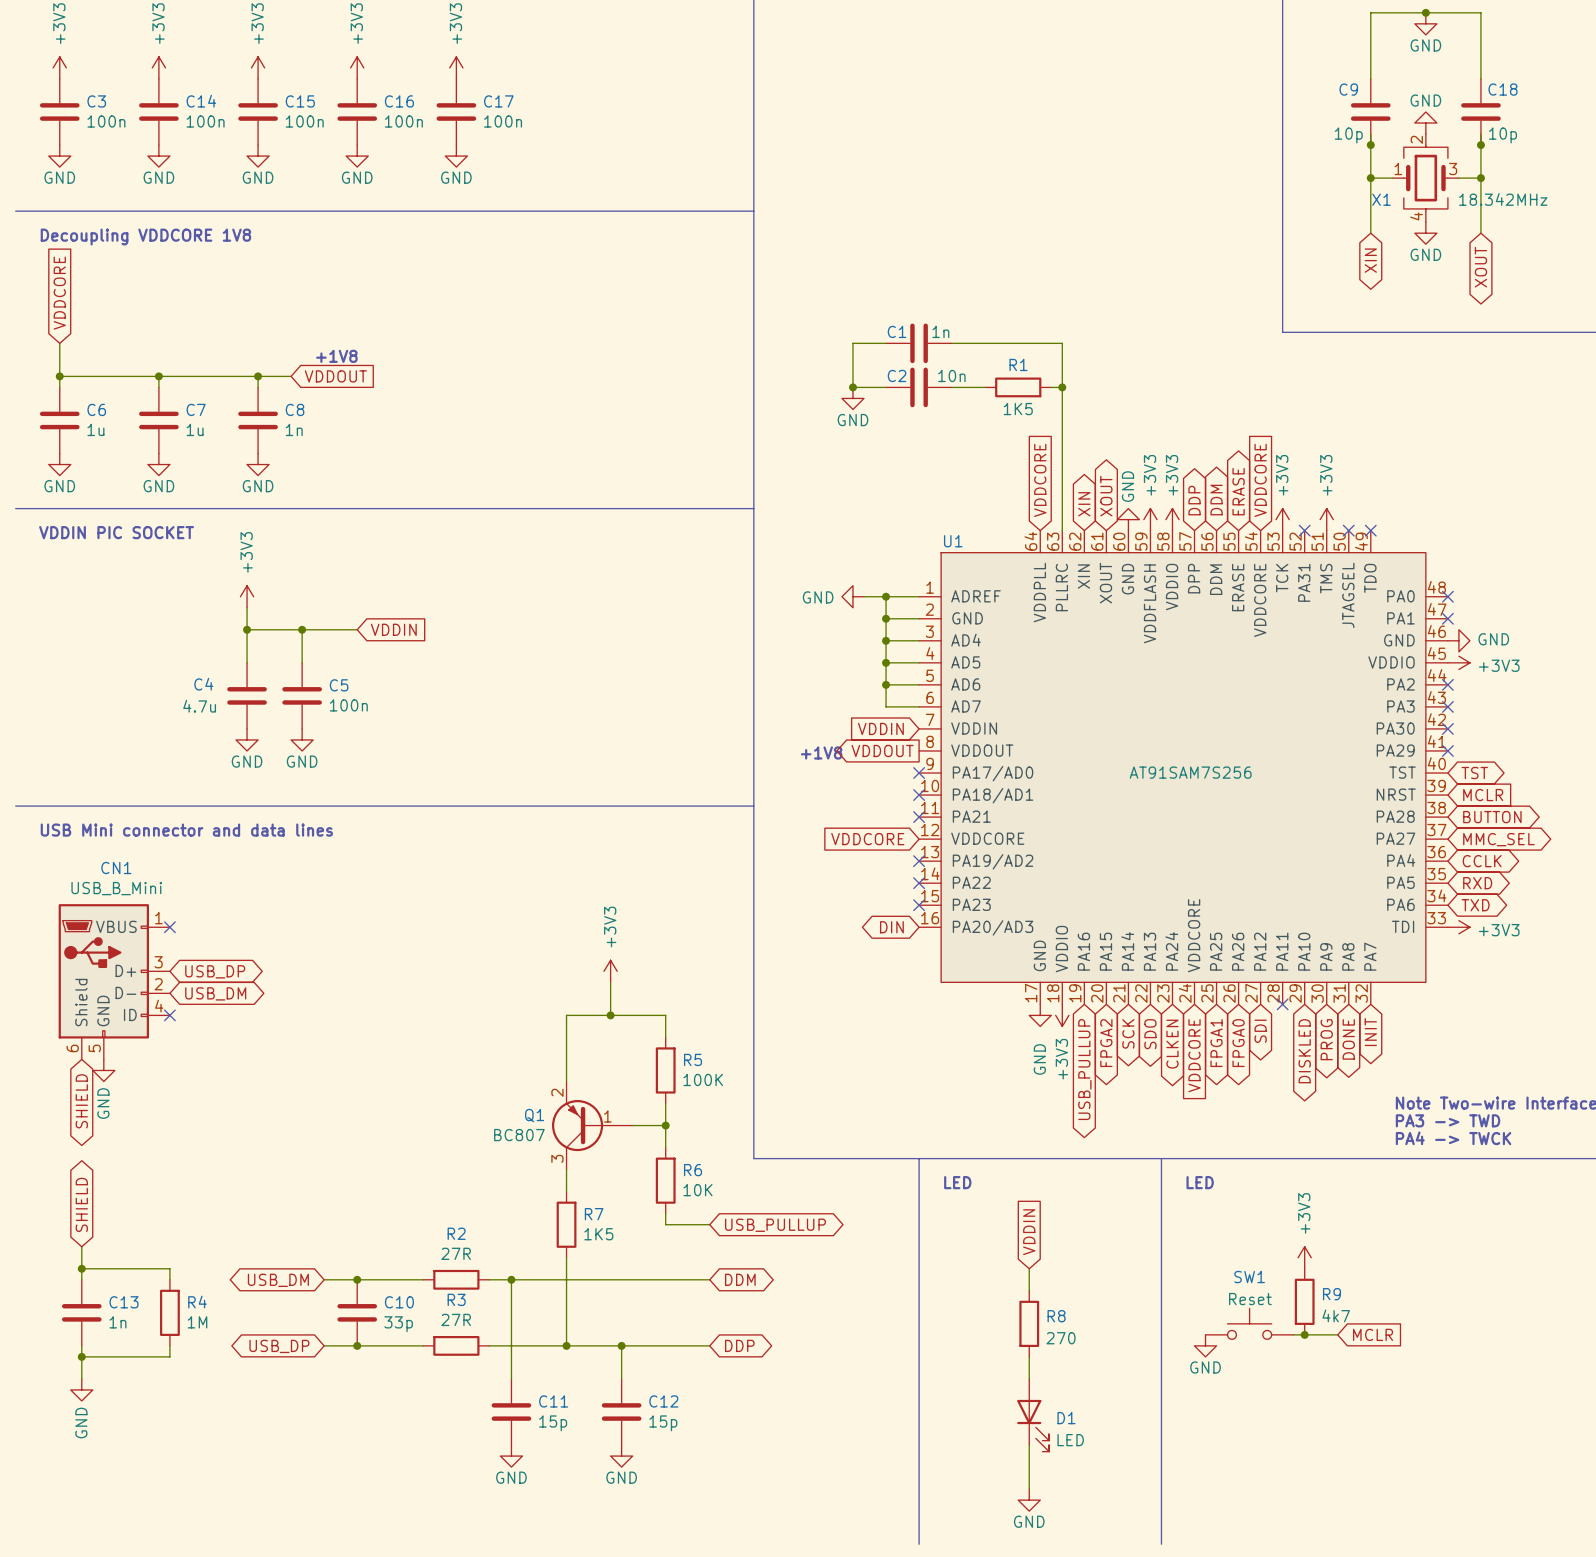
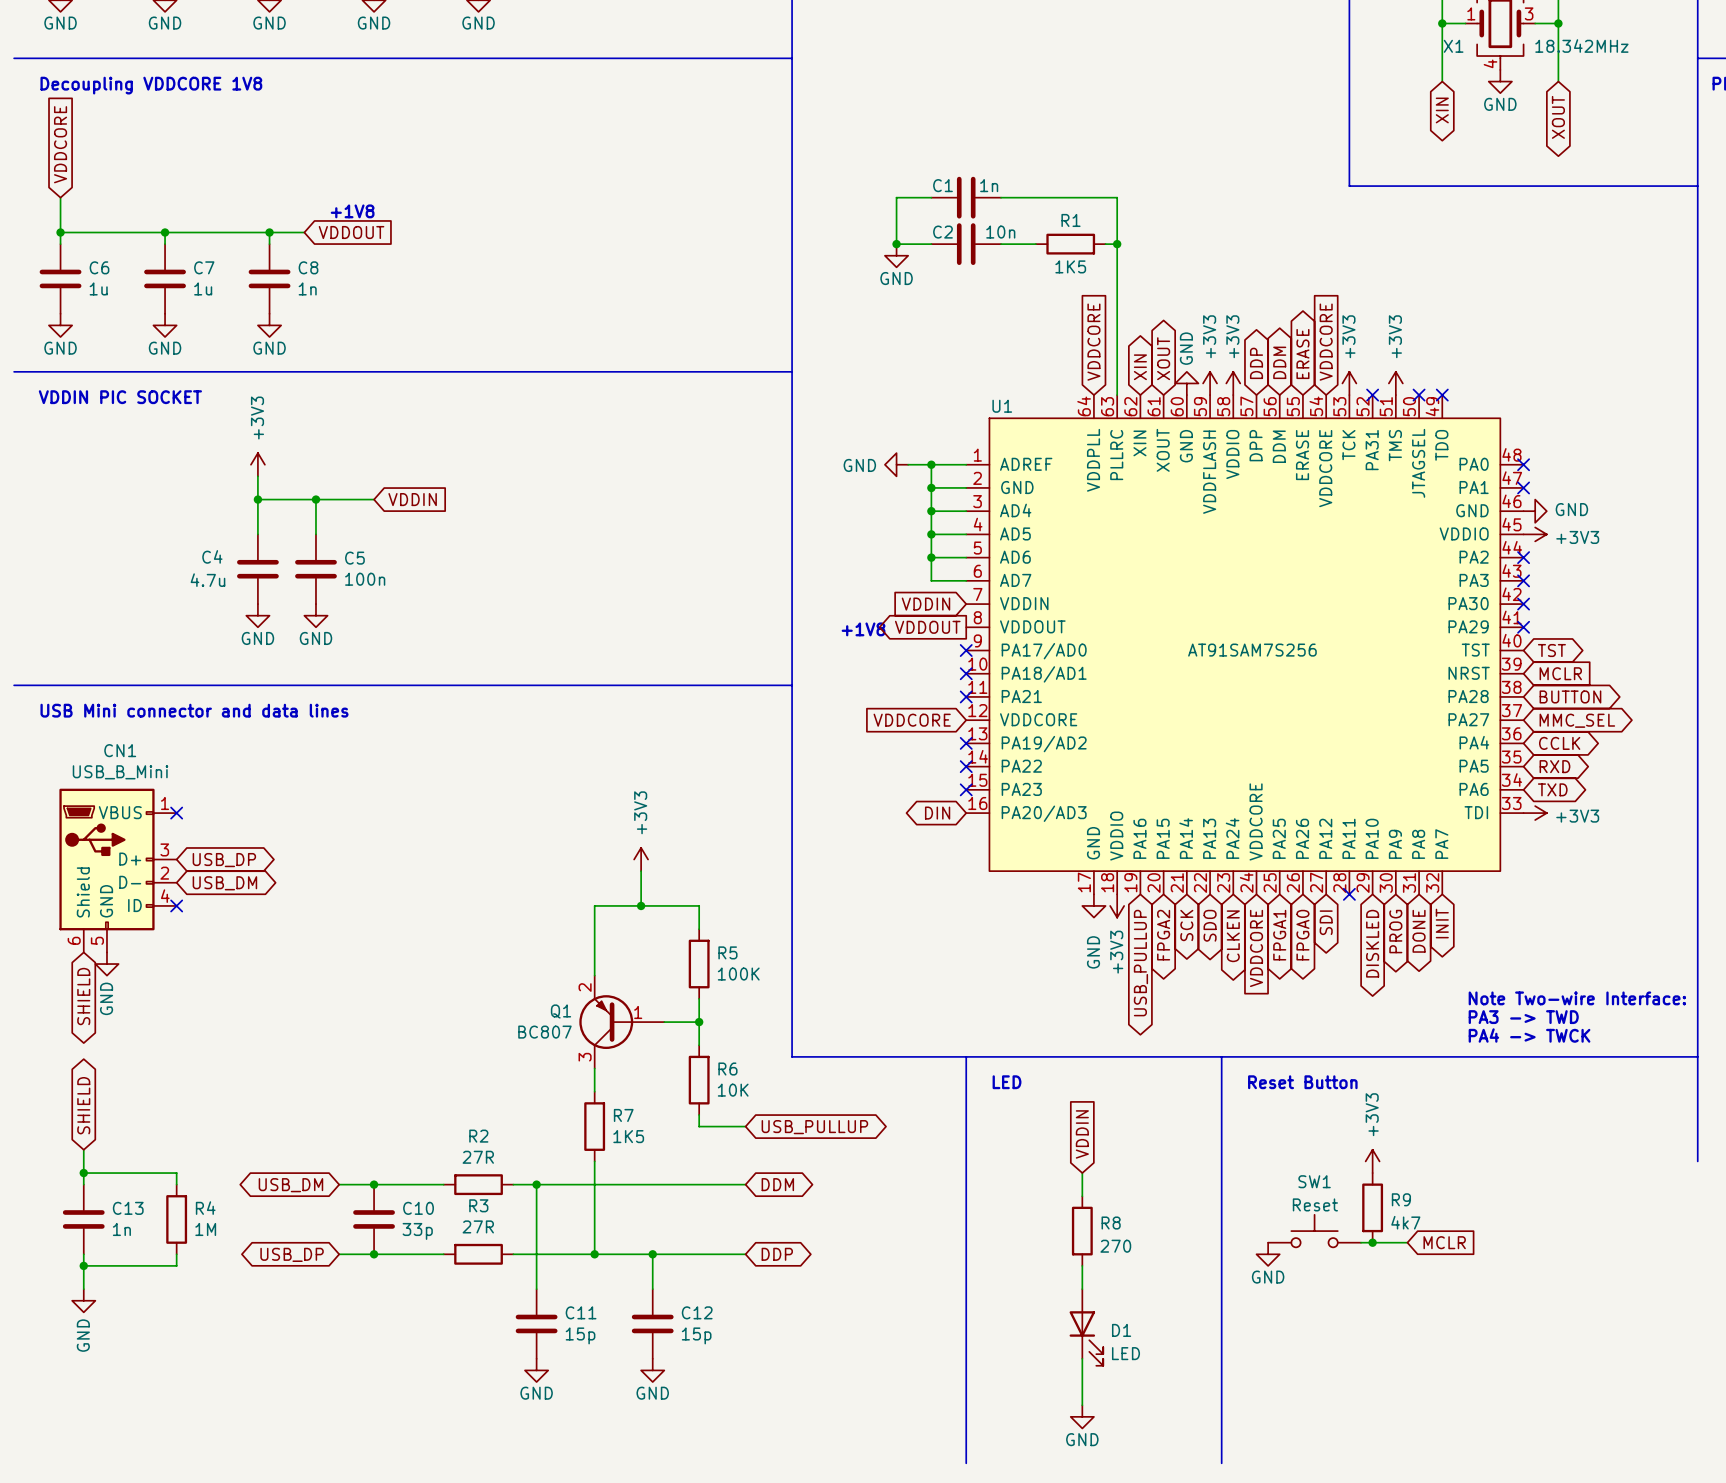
text: LED (1200, 1182) -> Reset Button (1302, 1082)

